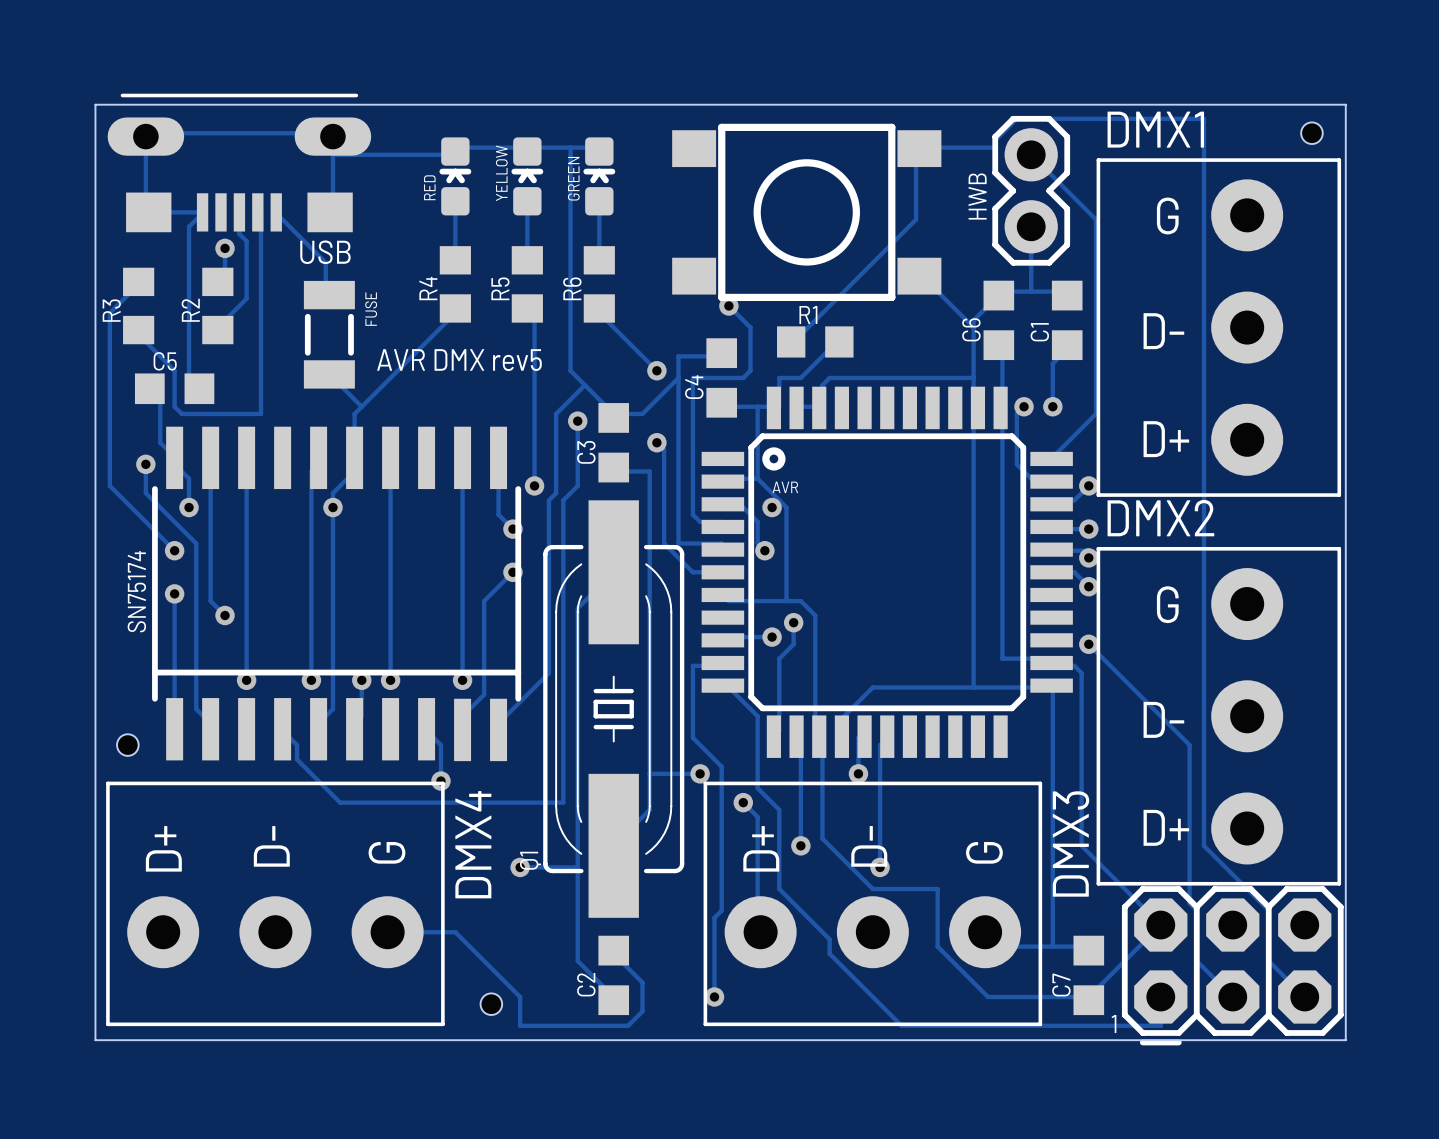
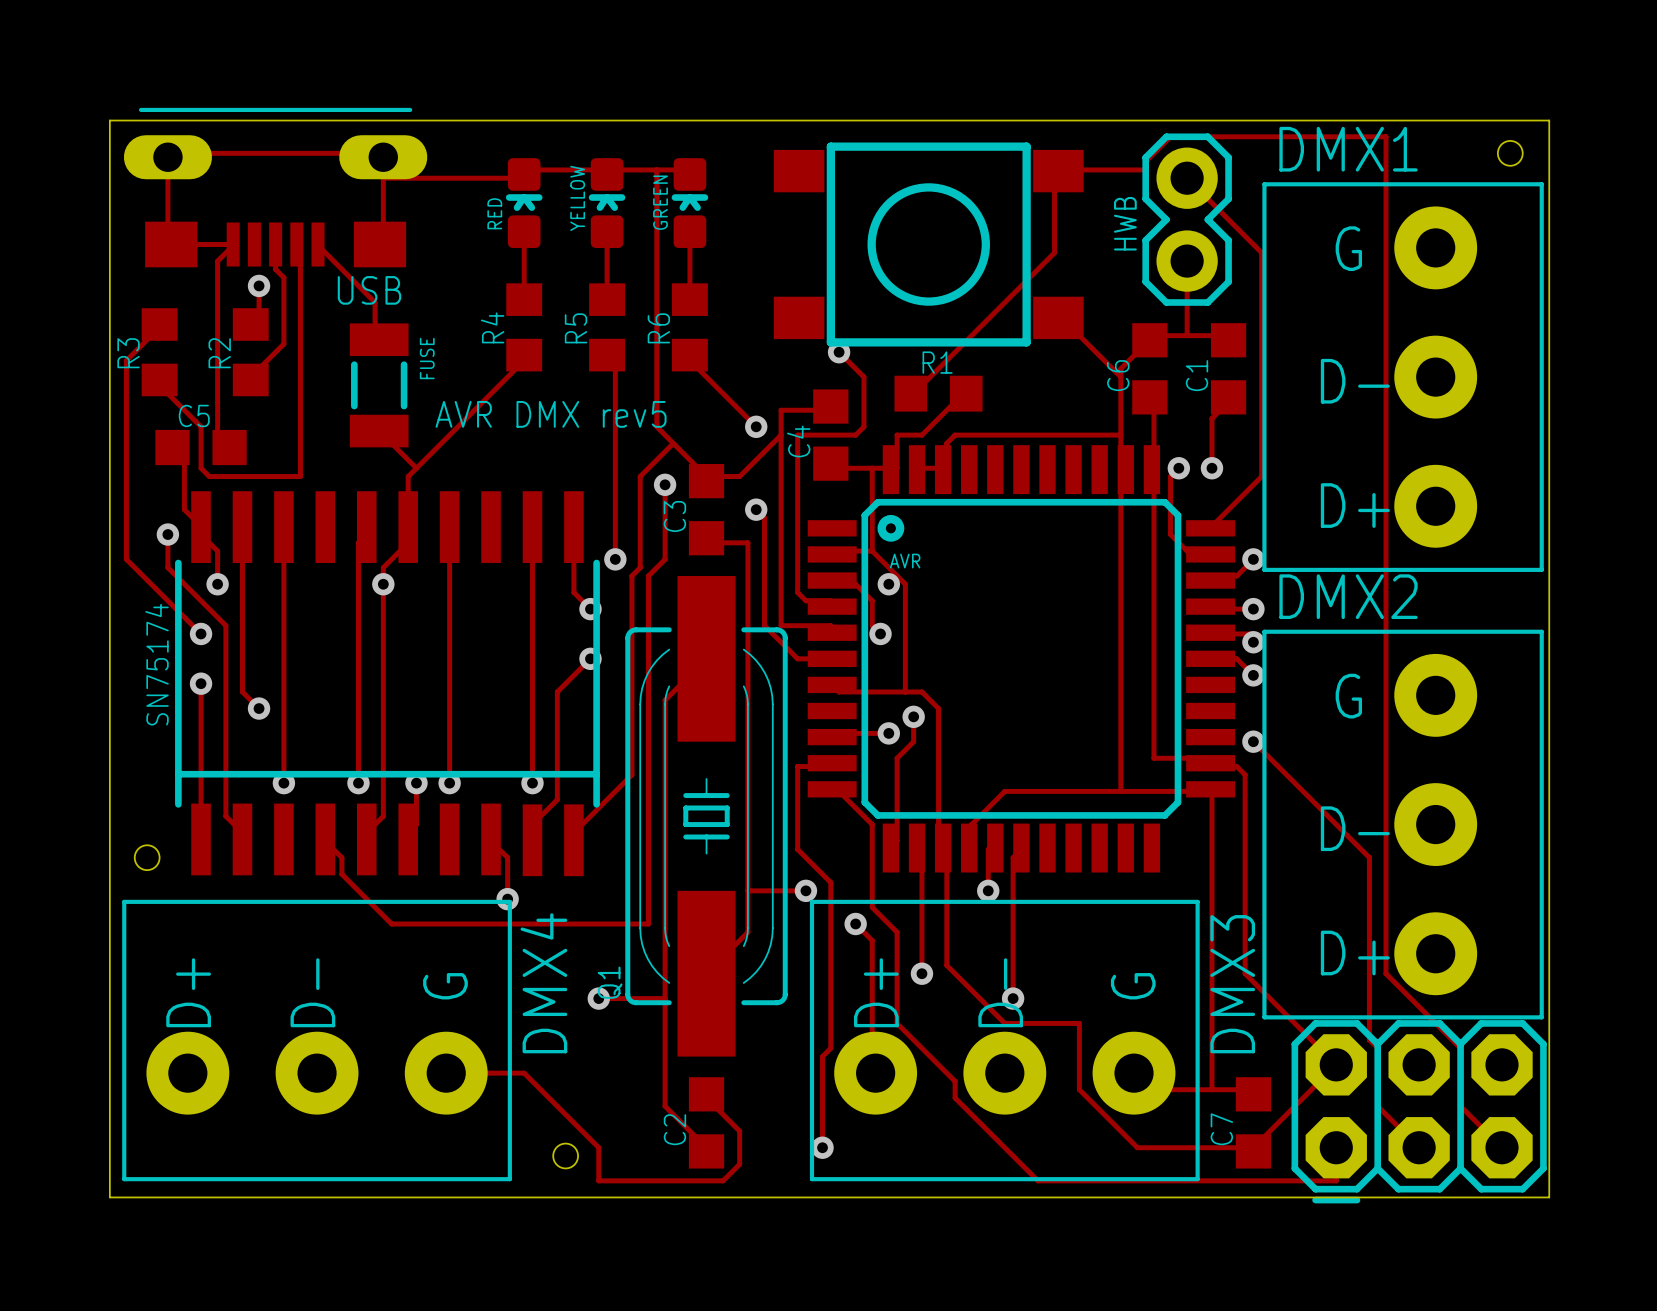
text: 1 (1114, 1024) -> none

